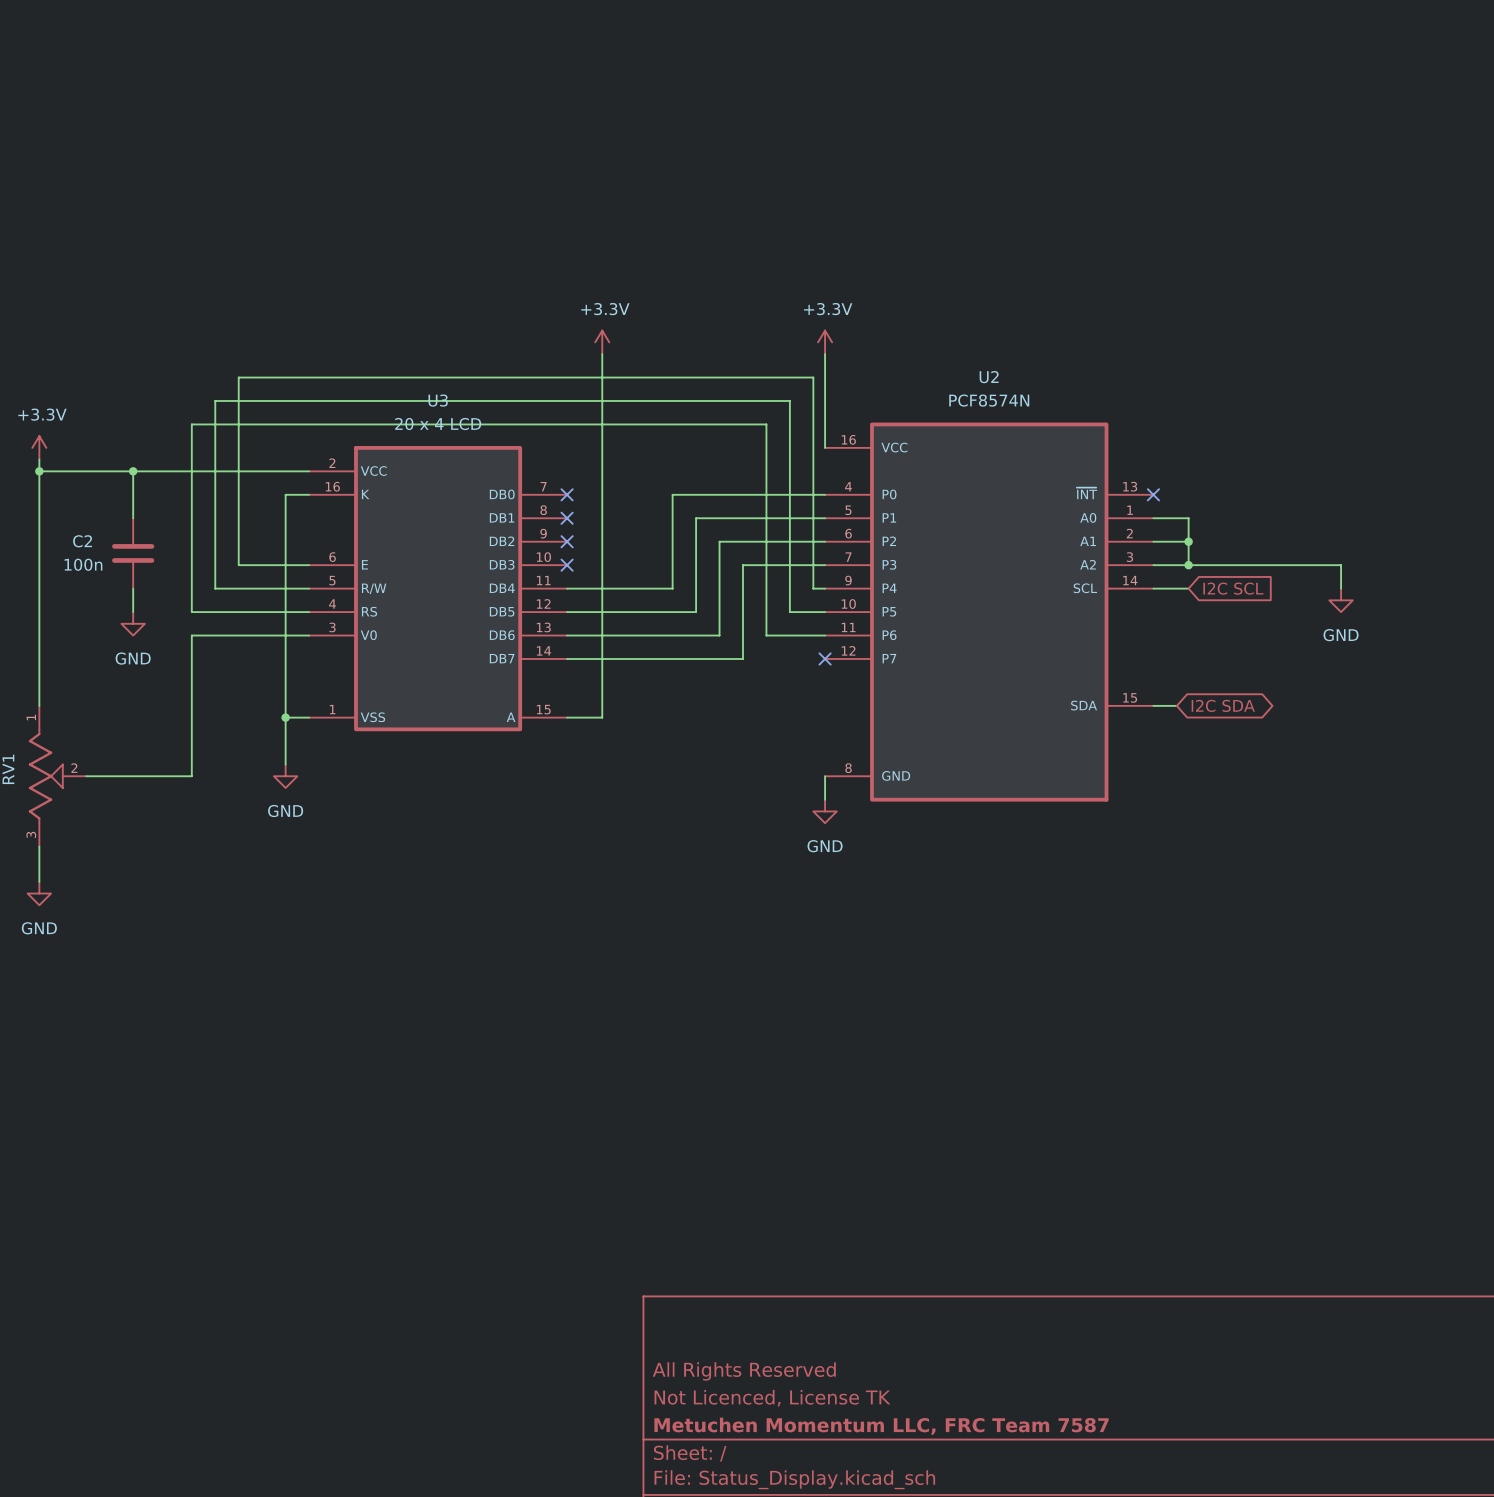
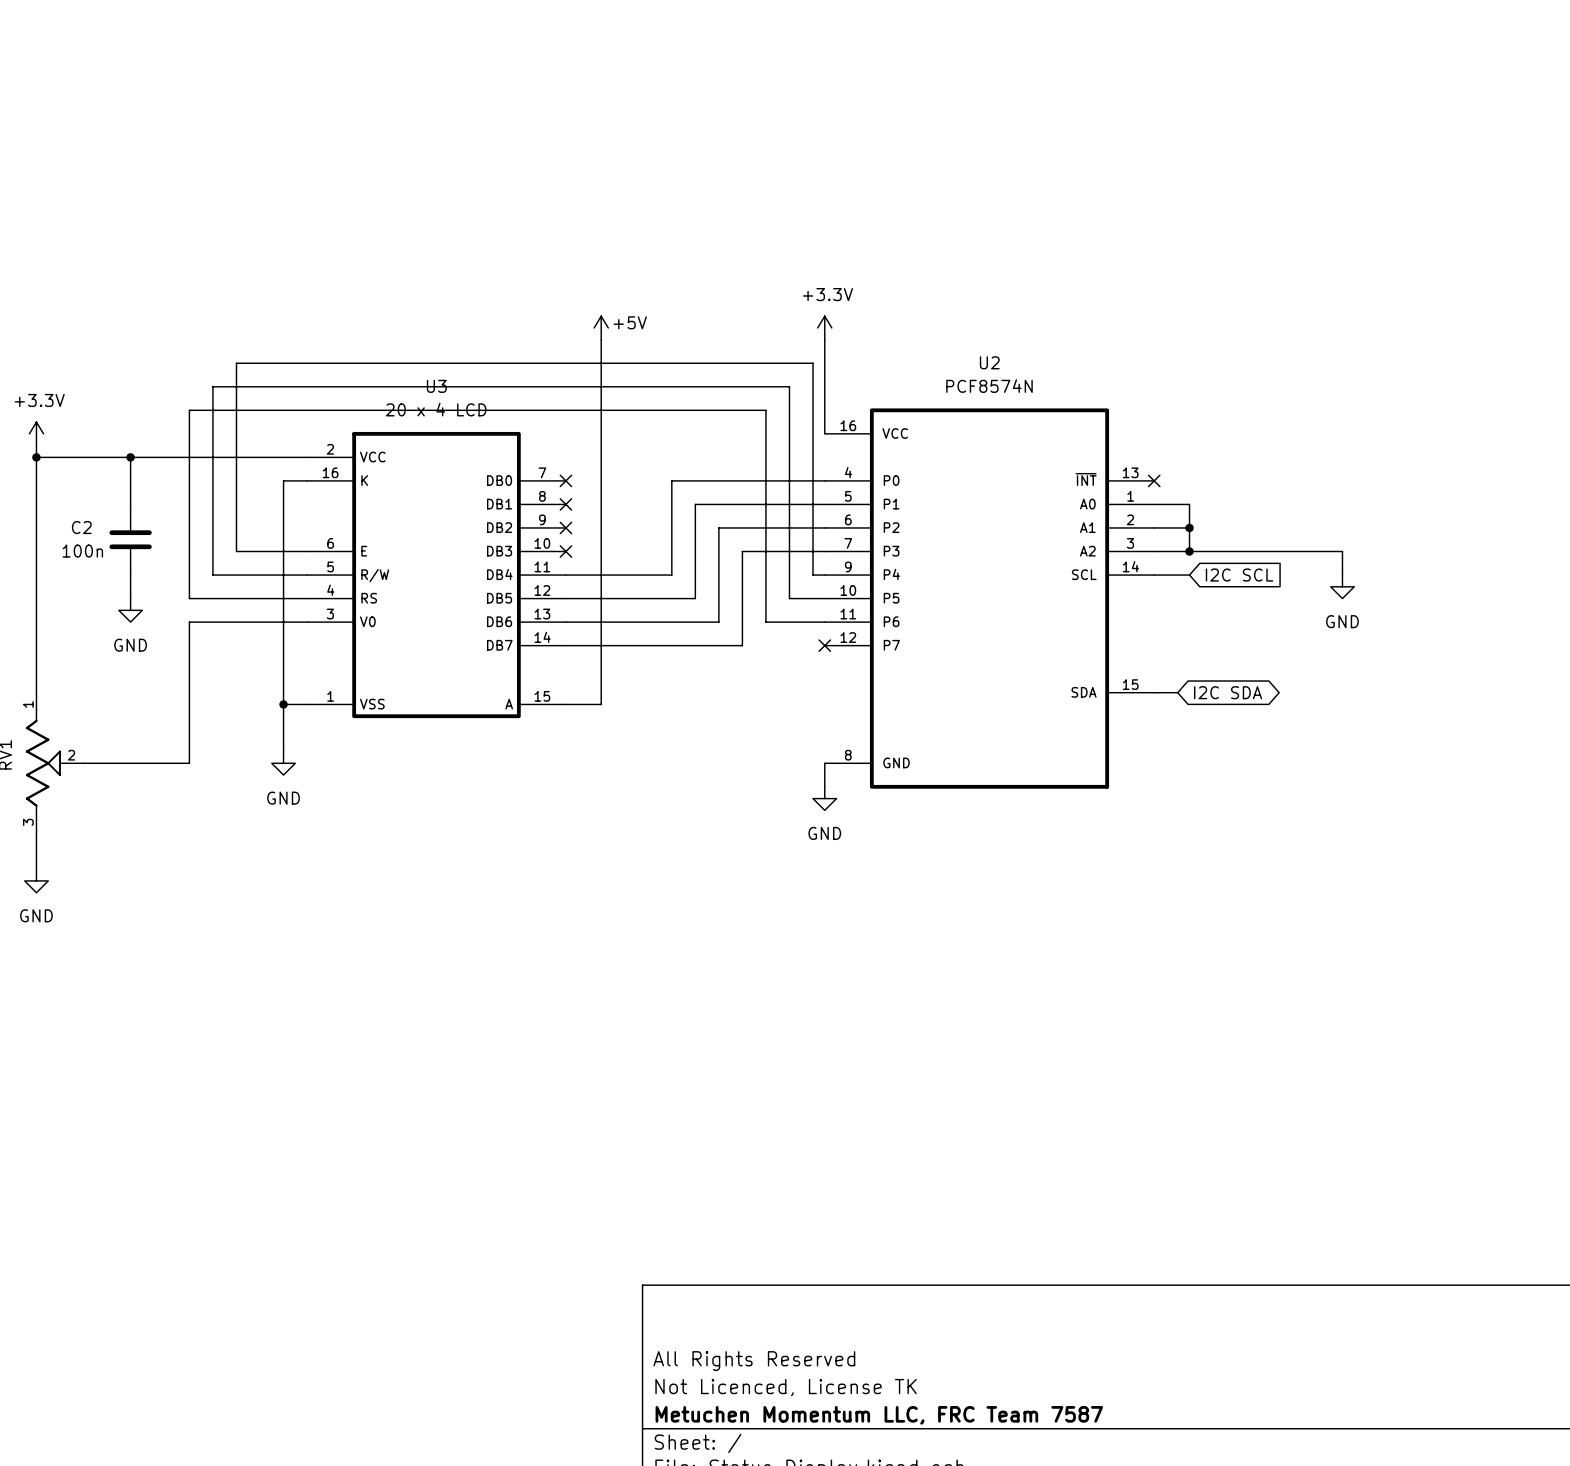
power symbol: +3.3V (602, 342) -> +5V (601, 327)

